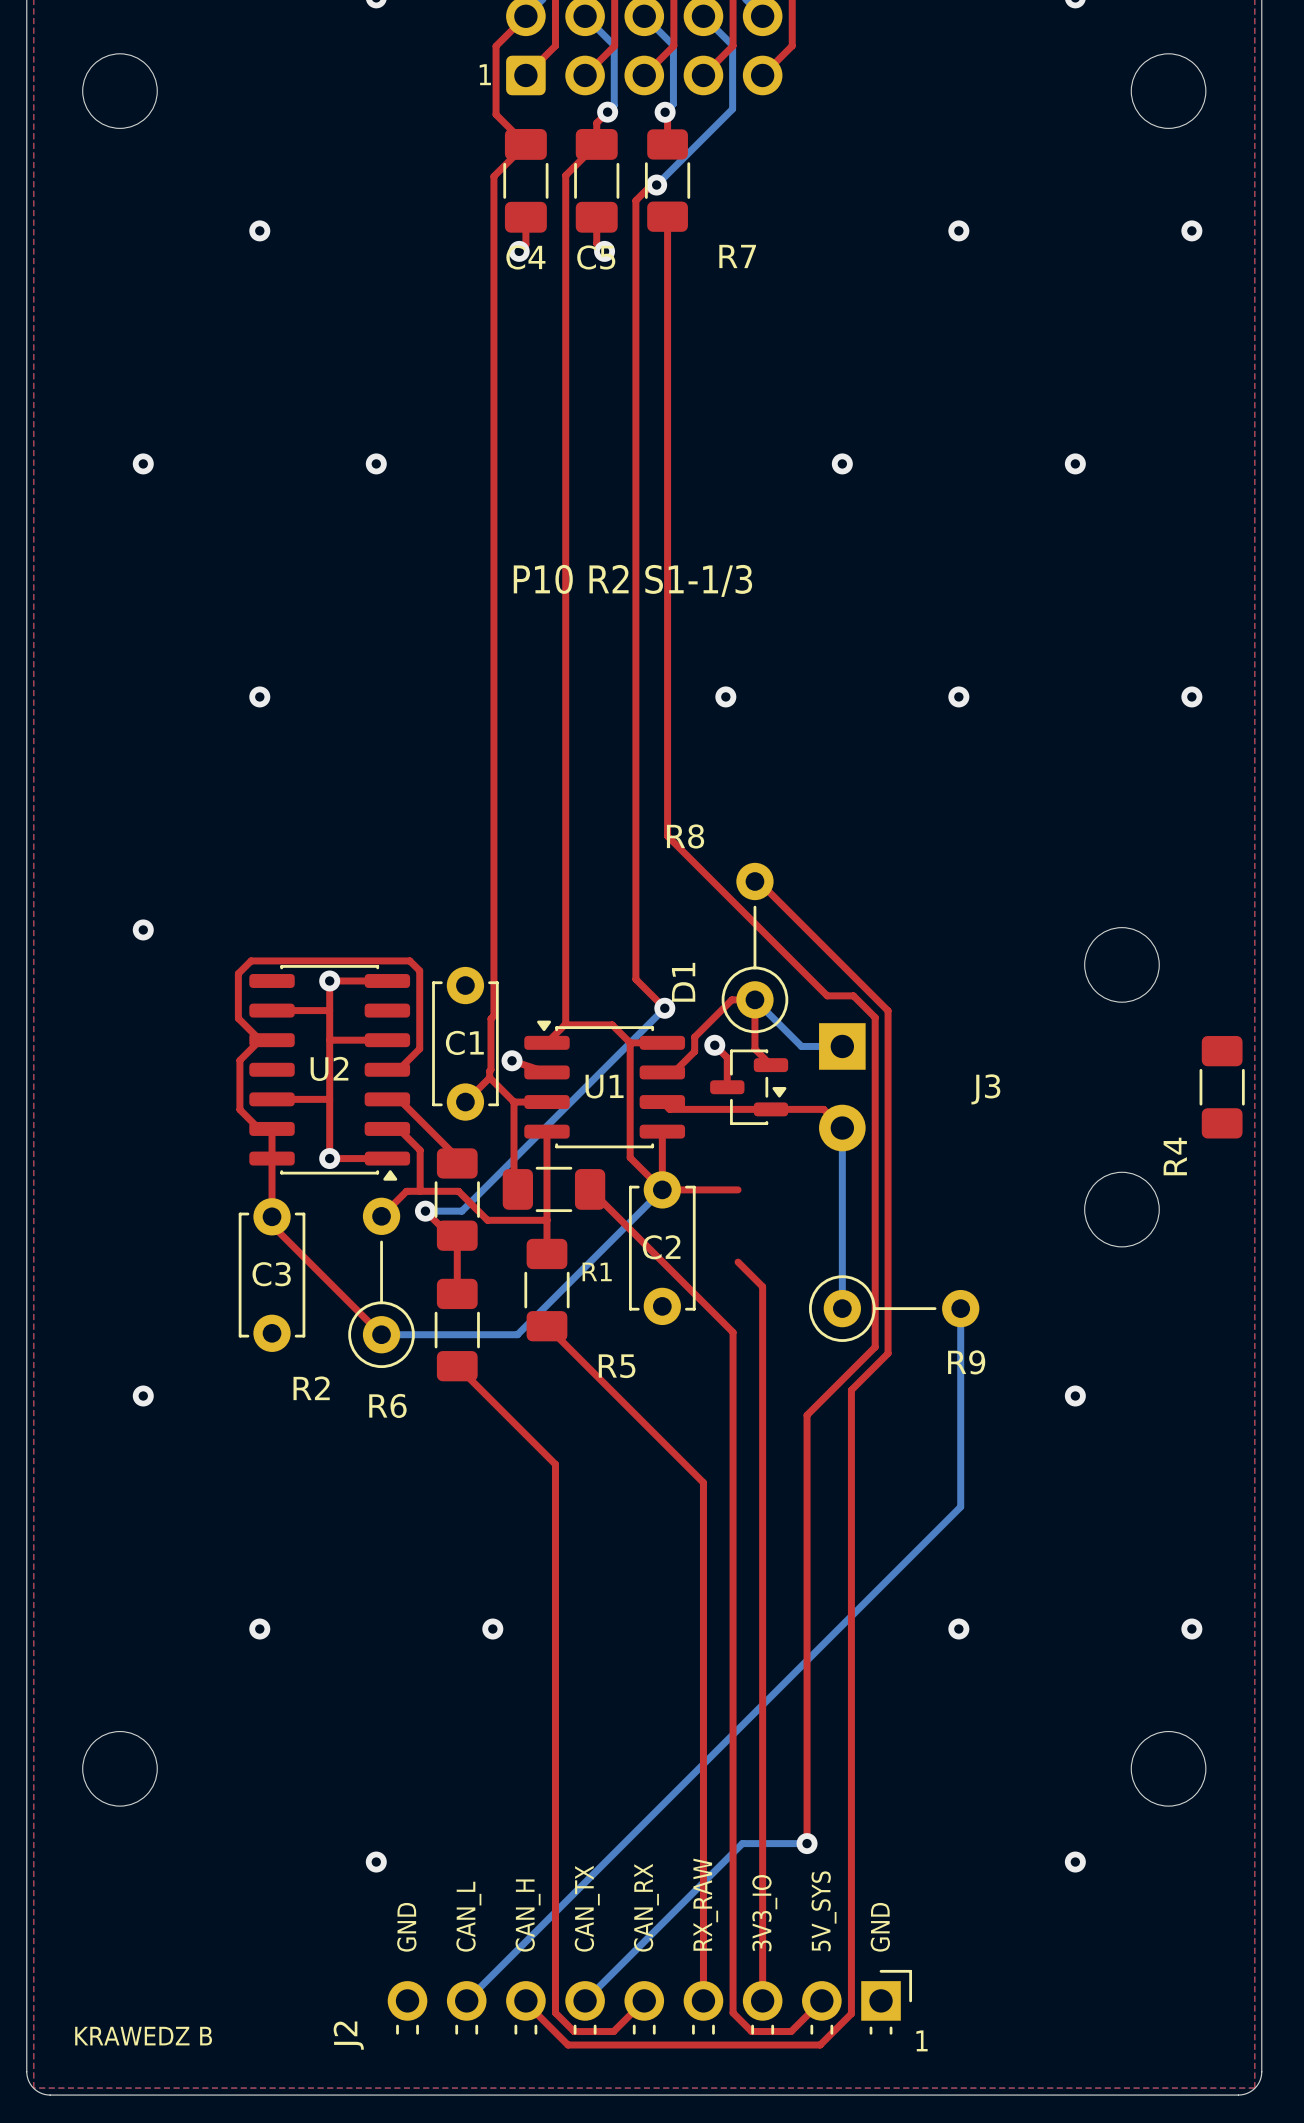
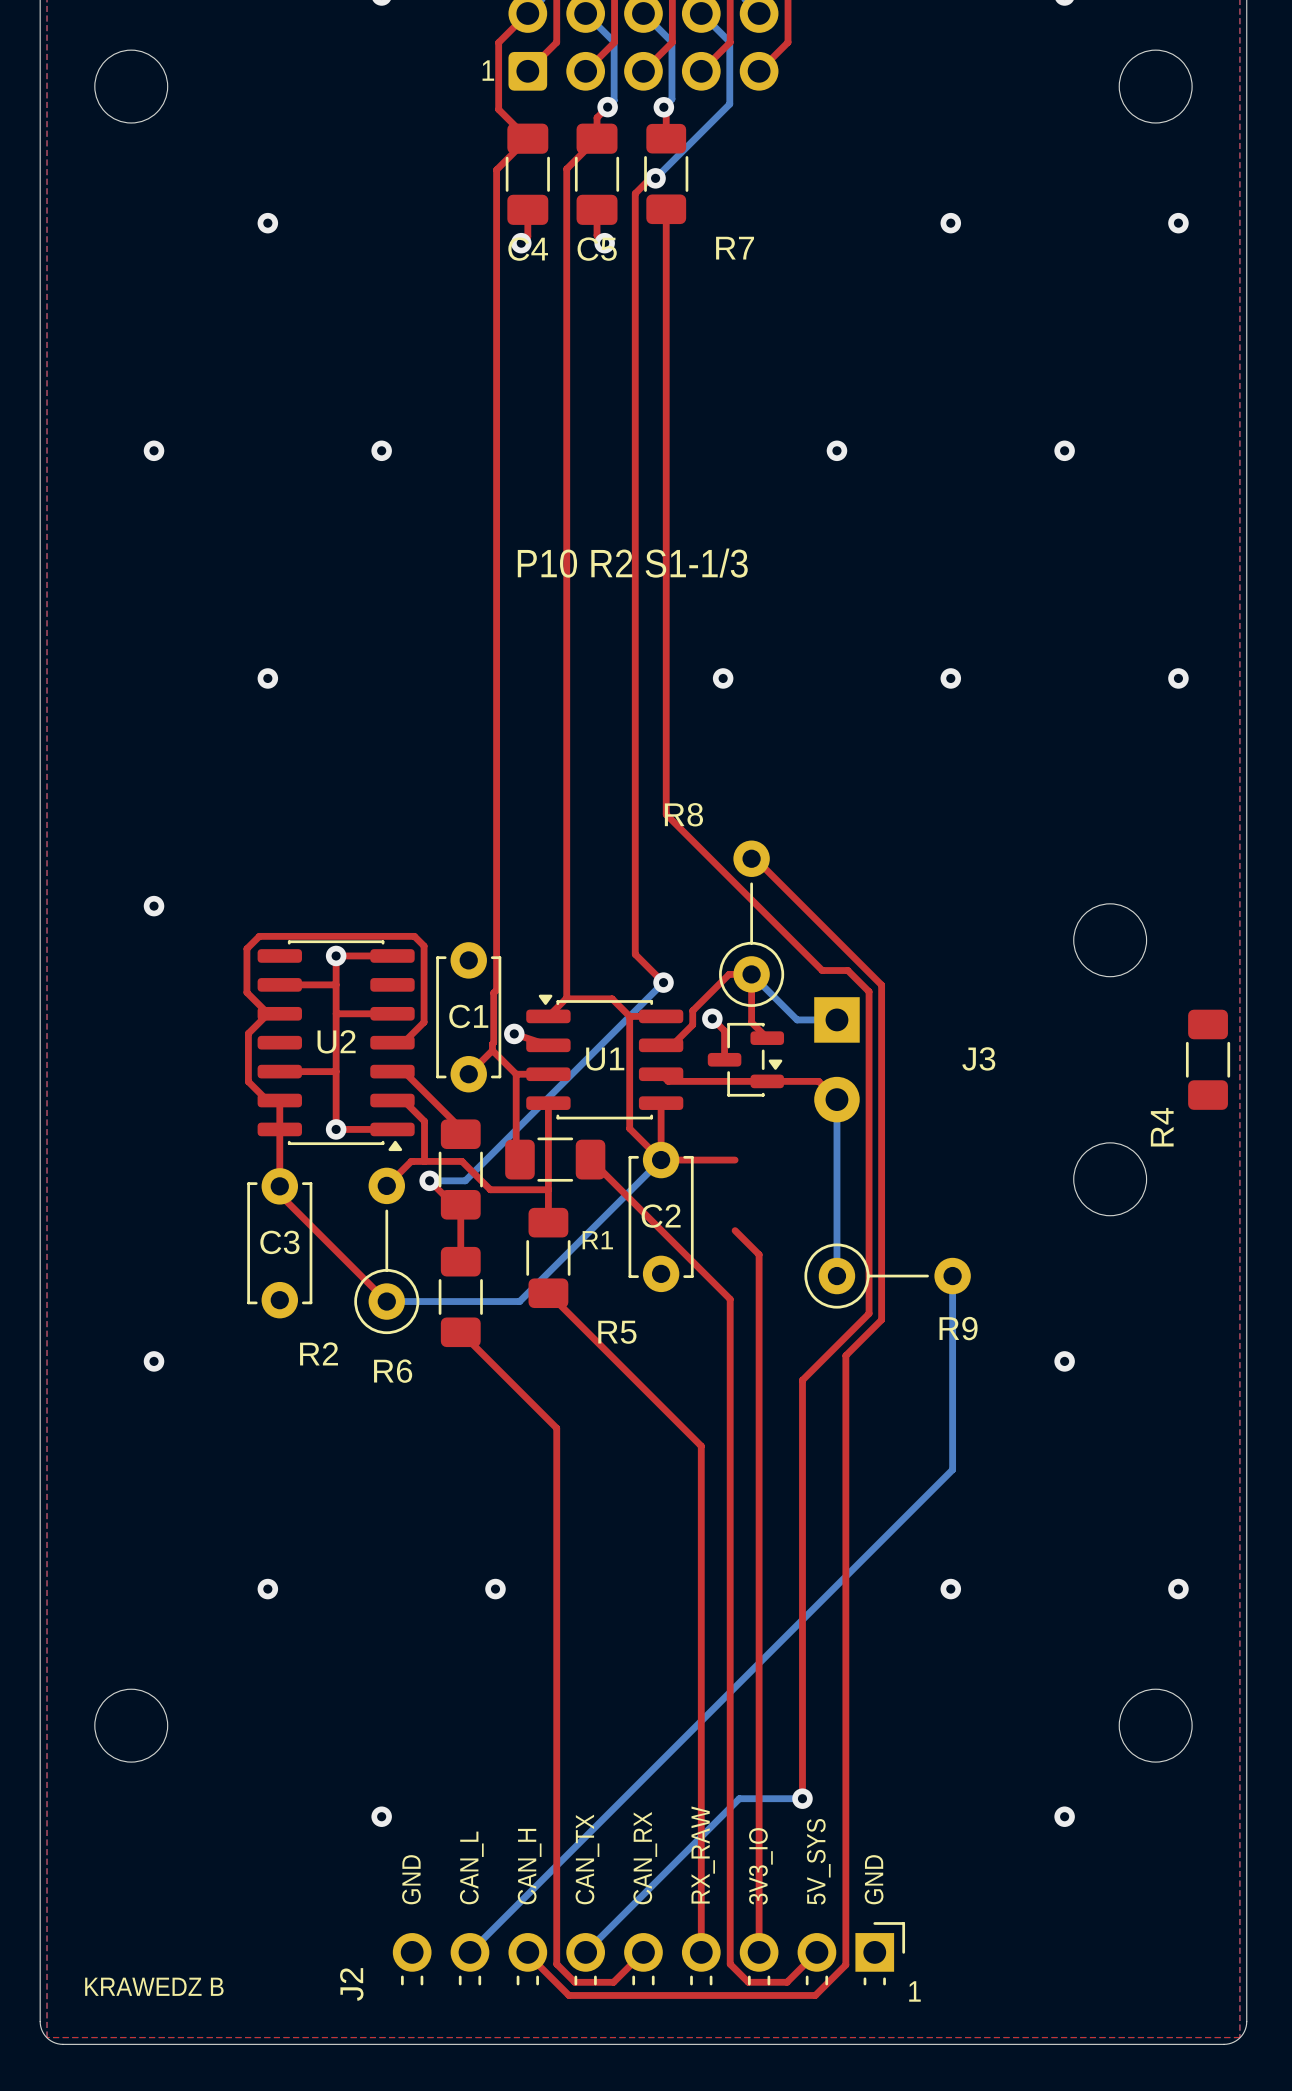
D1 name: D1 (683, 982) -> none

